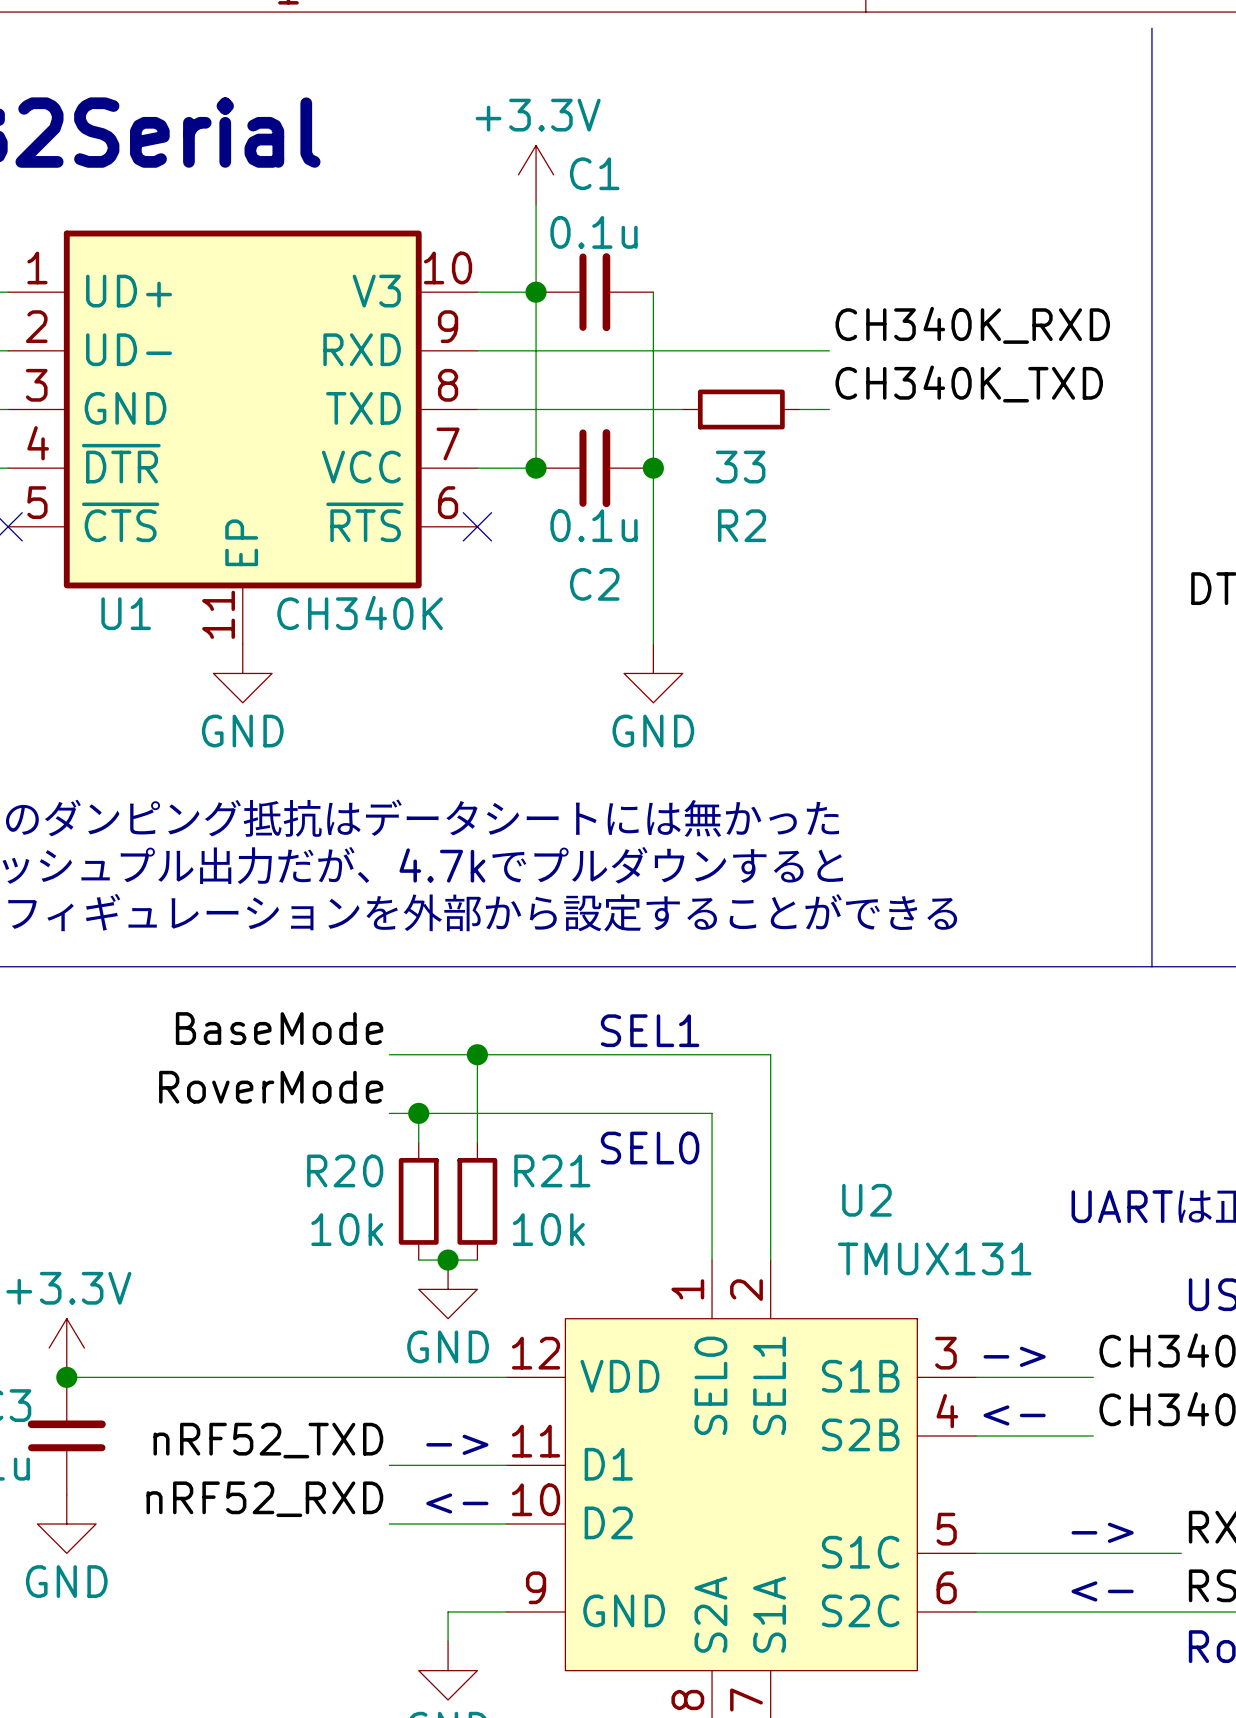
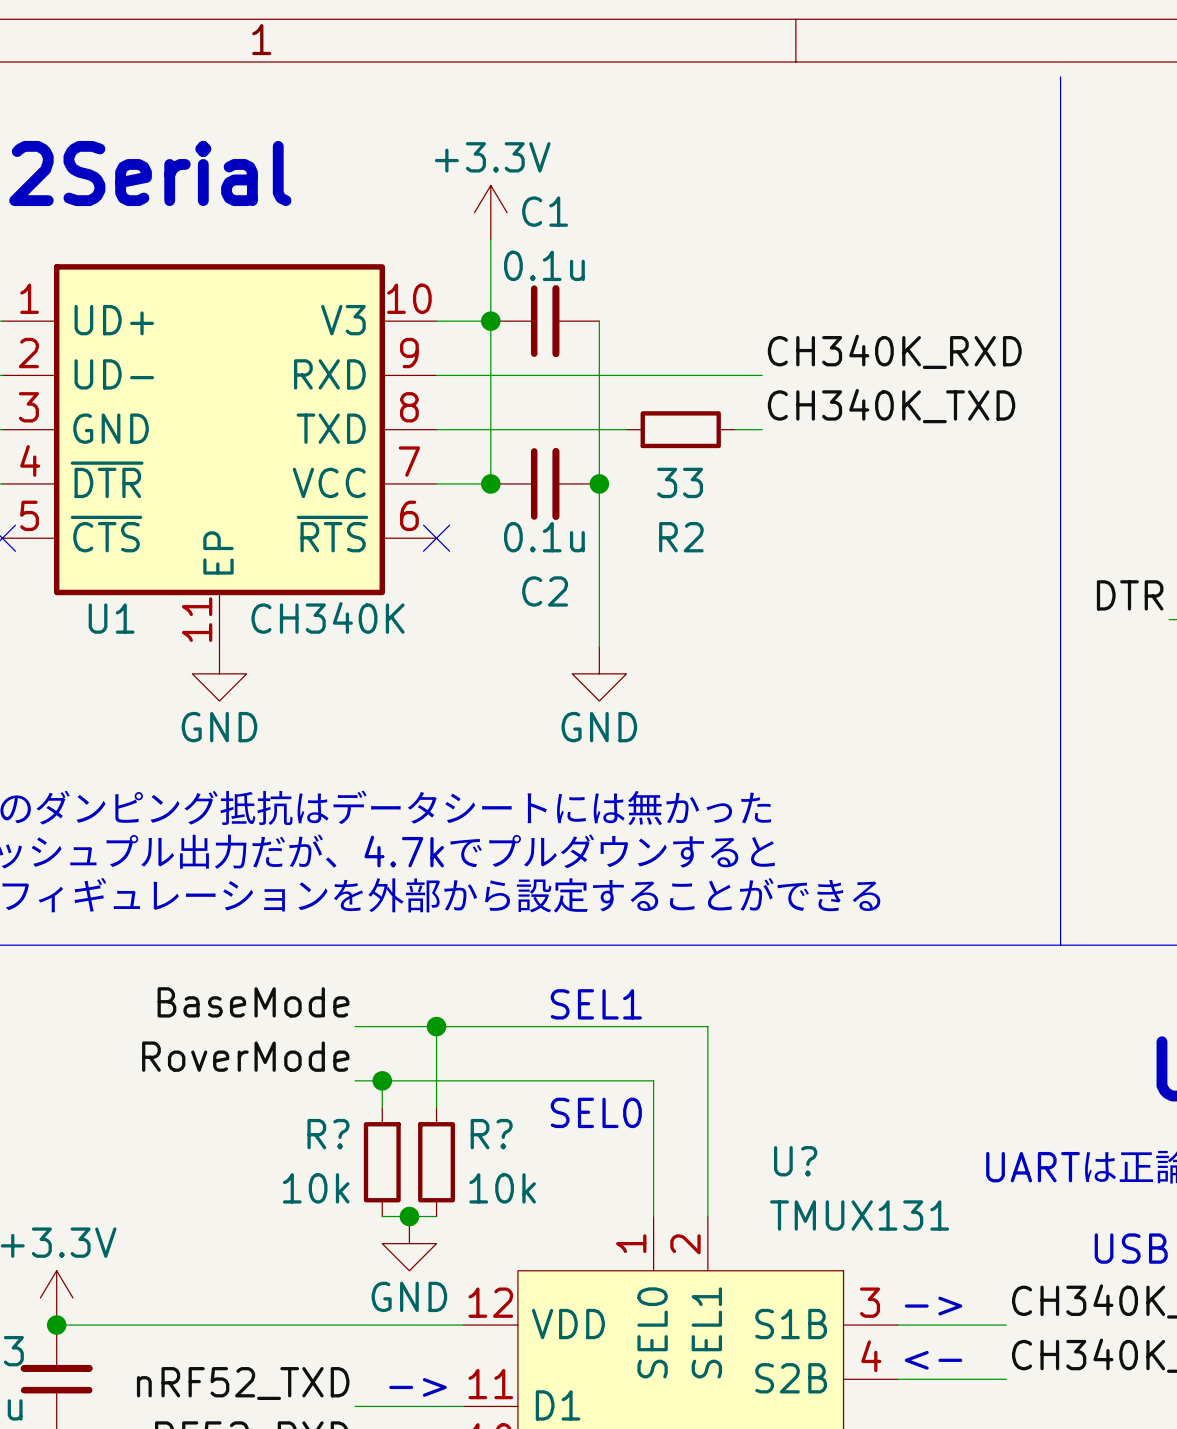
R20 name: R20 (345, 1170) -> R? (328, 1134)
R21 name: R21 (552, 1170) -> R? (491, 1134)
U2 name: U2 (866, 1200) -> U? (795, 1161)

